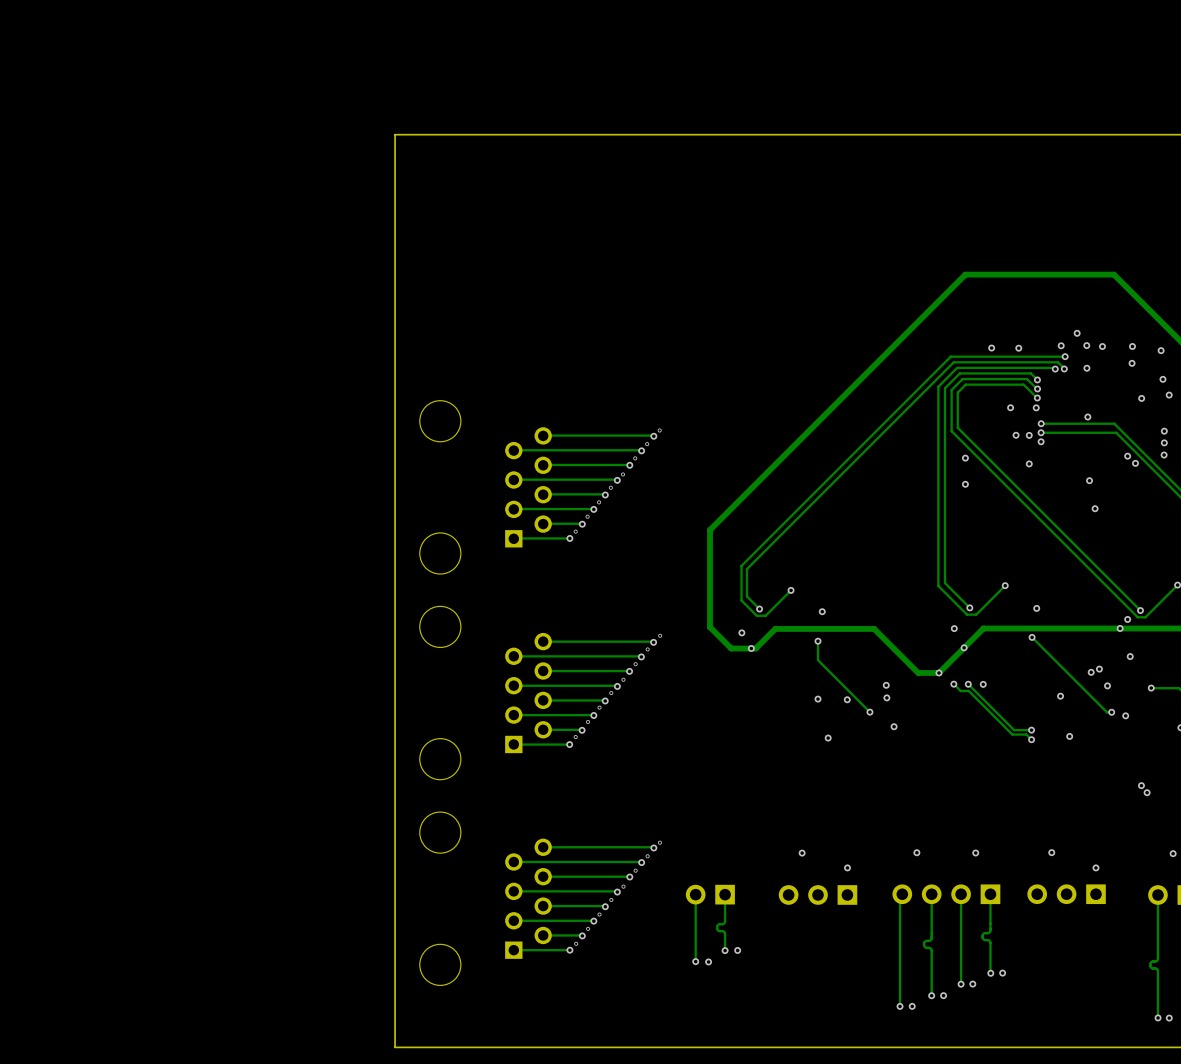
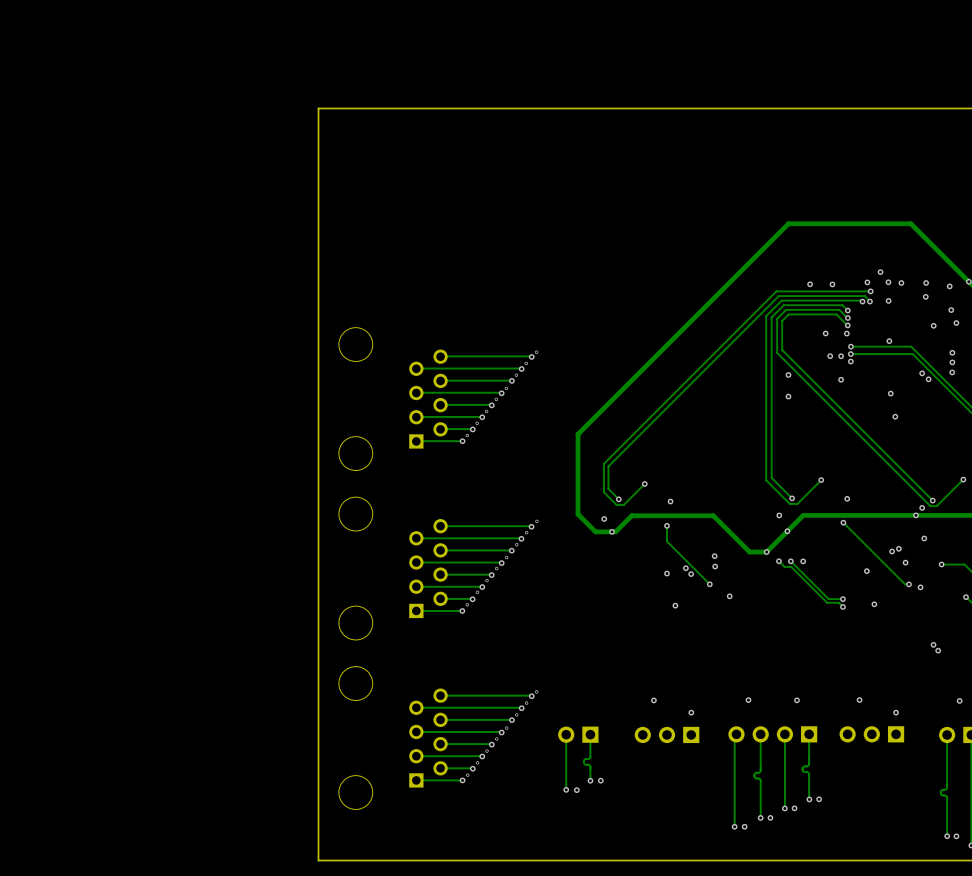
via: none -> (714, 556)
via: (886, 685) -> none
via: none -> (715, 566)
via: none -> (685, 568)
via: (886, 697) -> none

